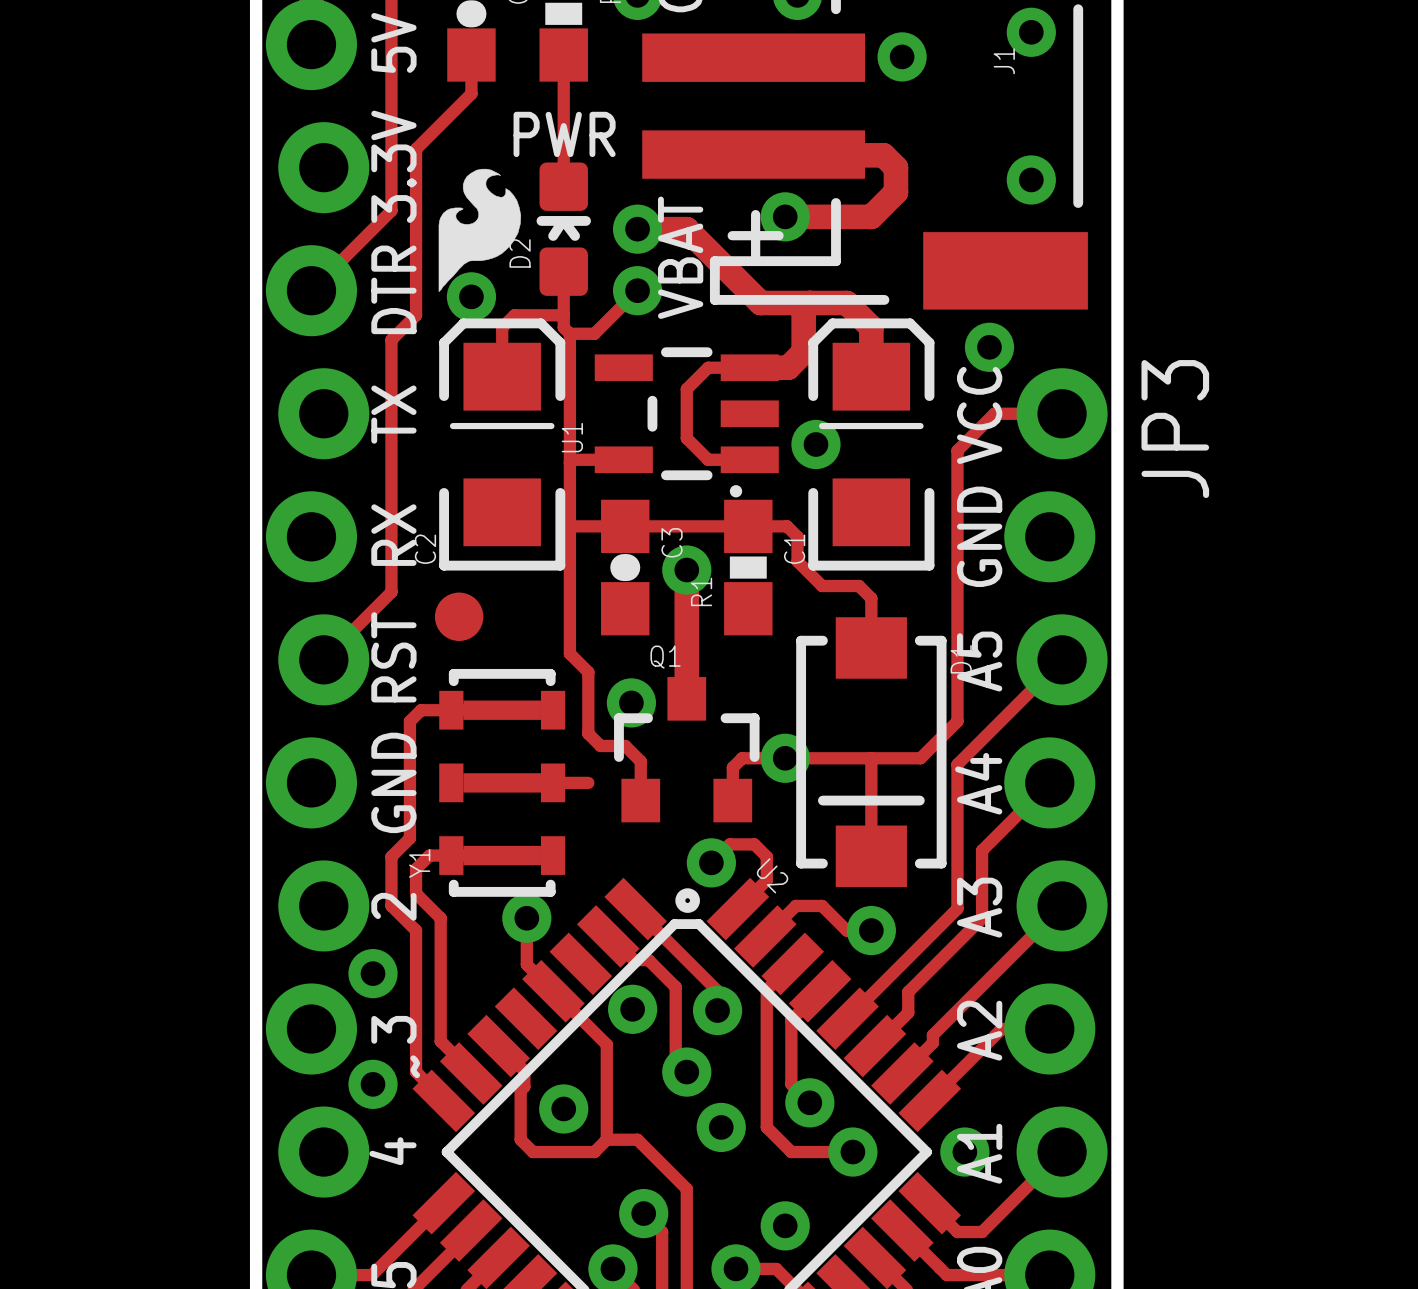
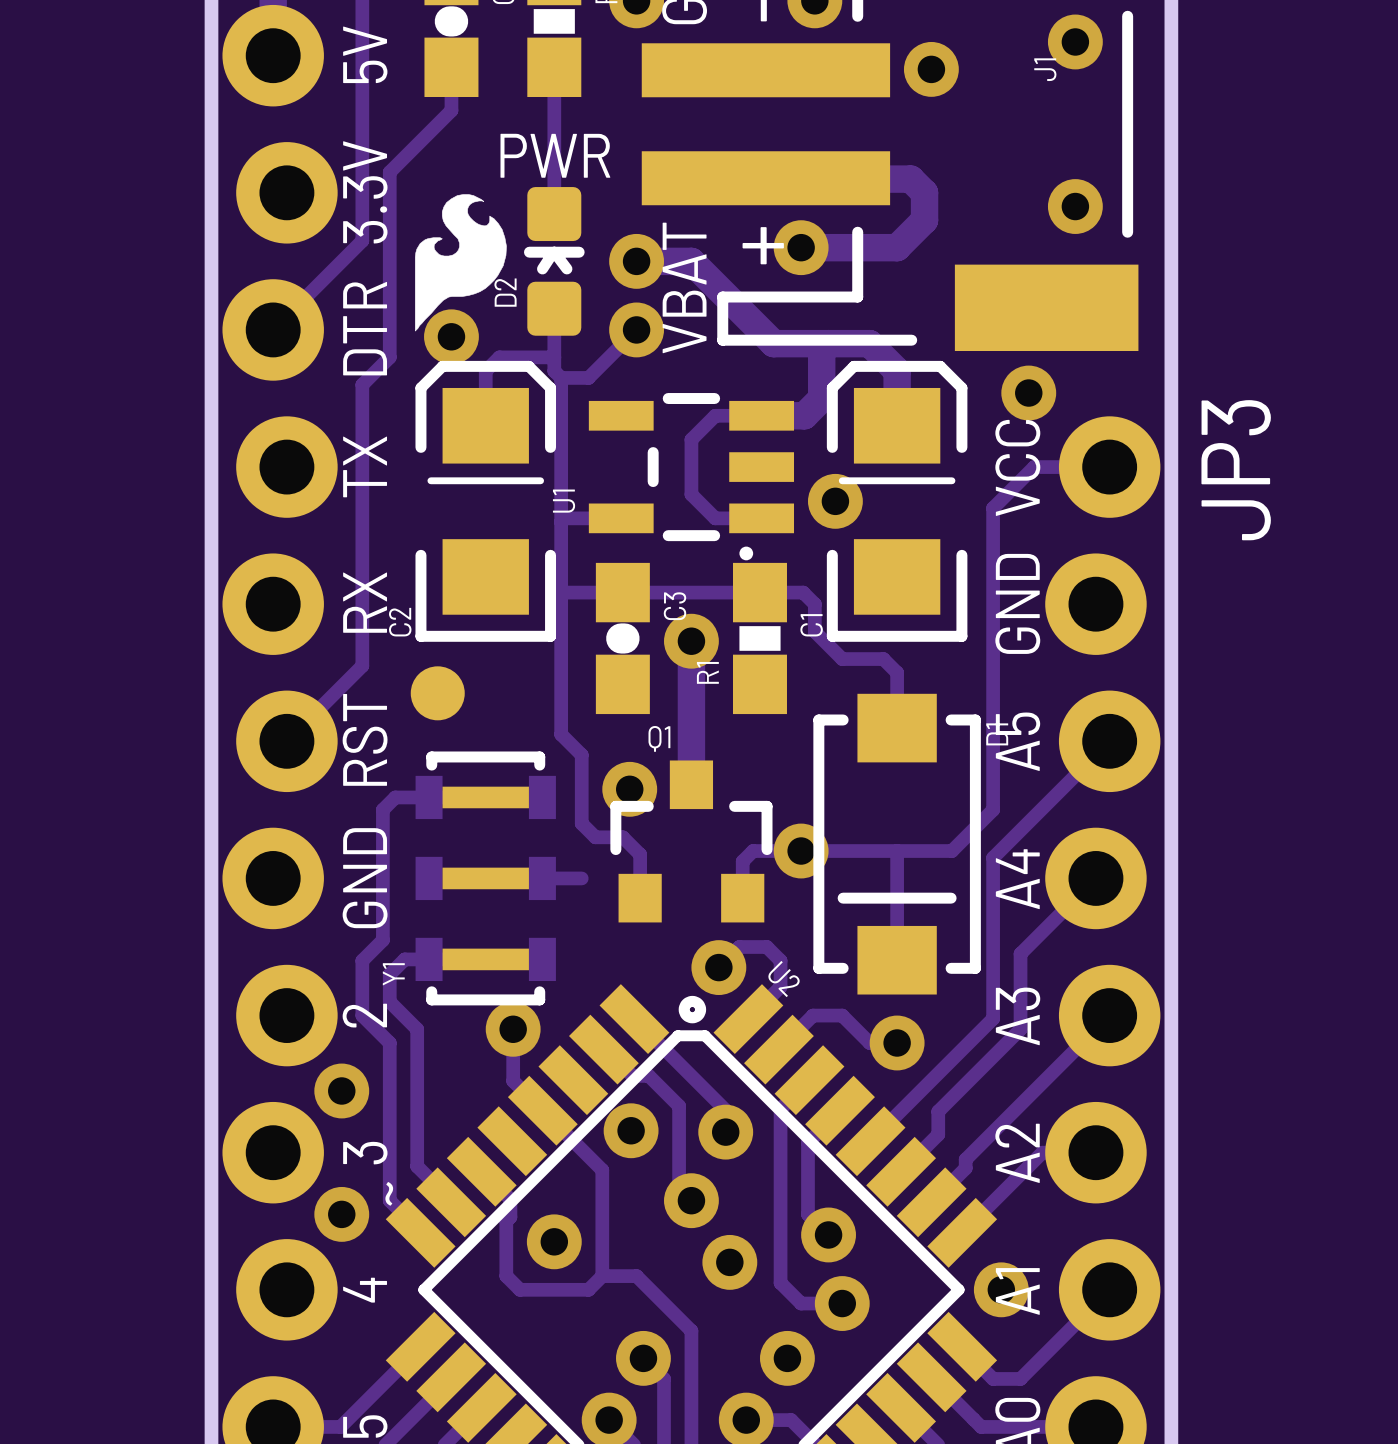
track: (766, 1127) (791, 1152) (852, 1152) -> (780, 1262) (780, 1282) (801, 1303) (842, 1303)
via position: (852, 1152) -> (842, 1303)
via position: (785, 1225) -> (787, 1358)

